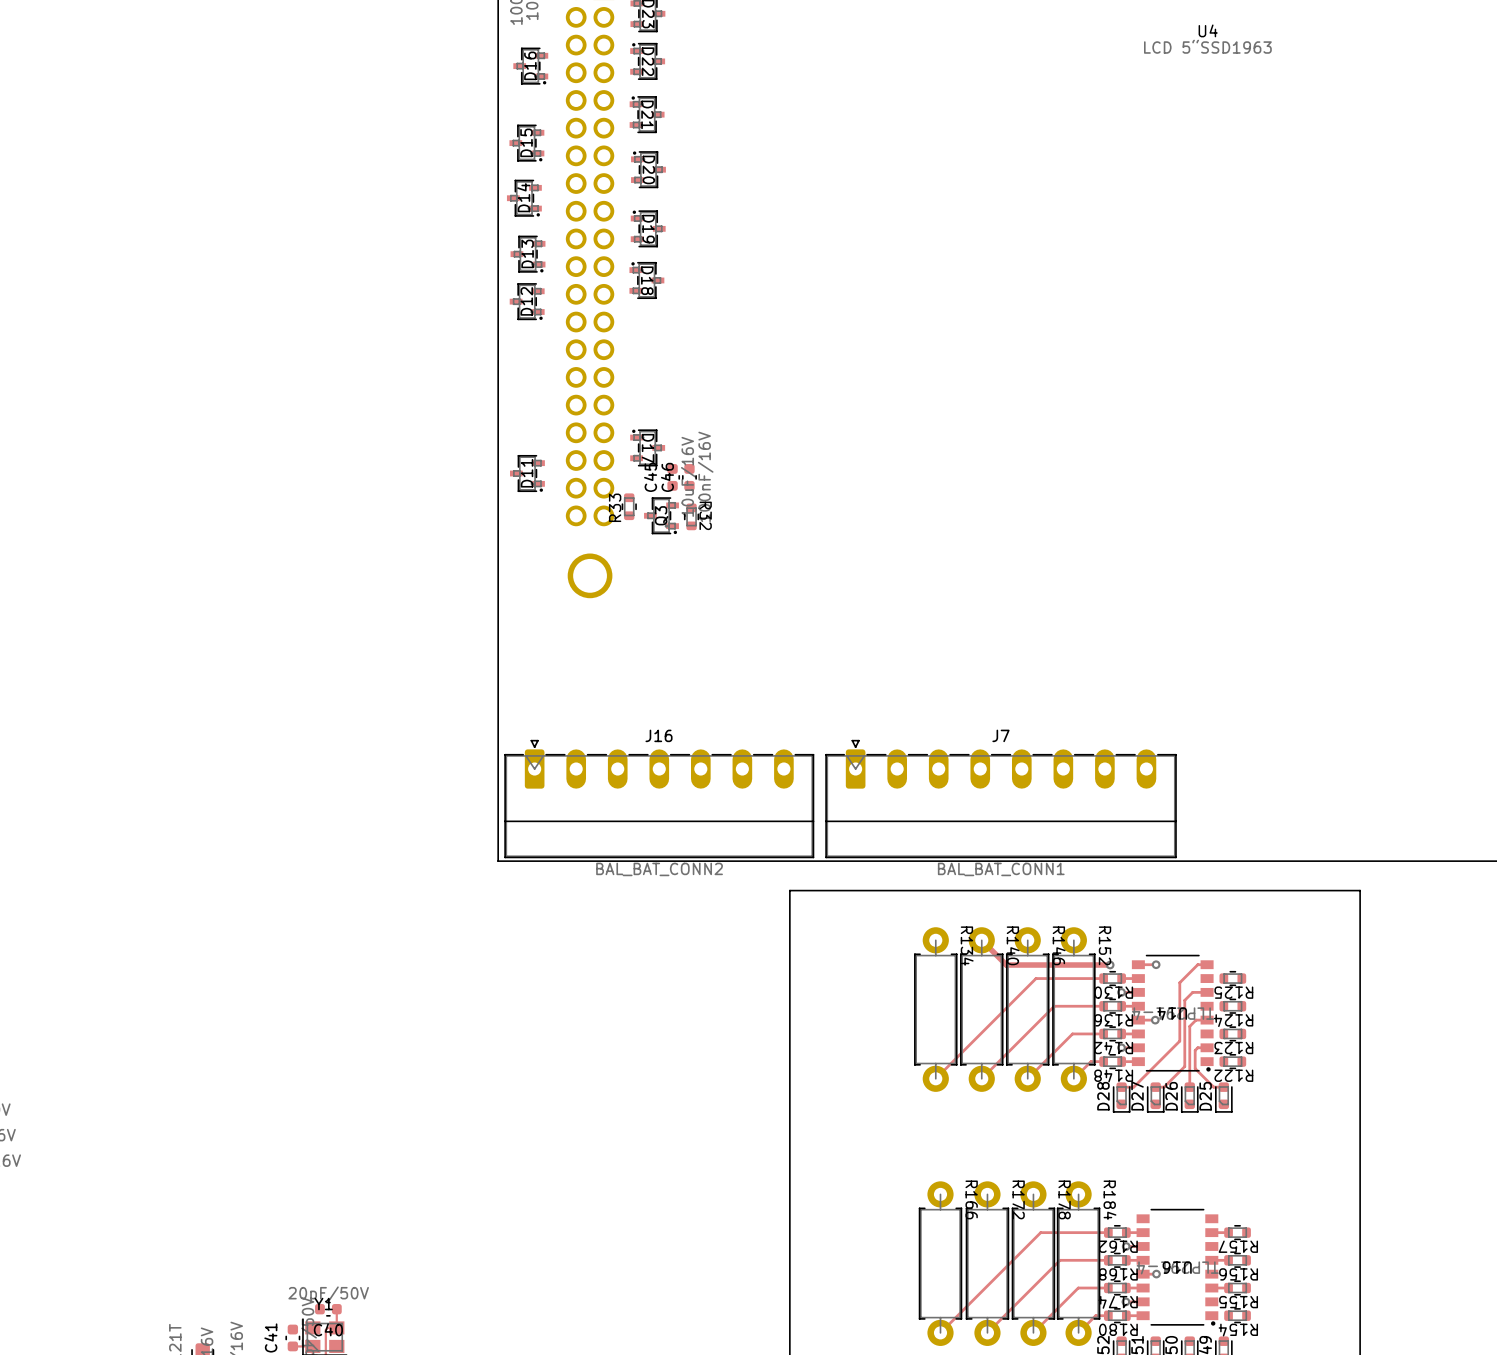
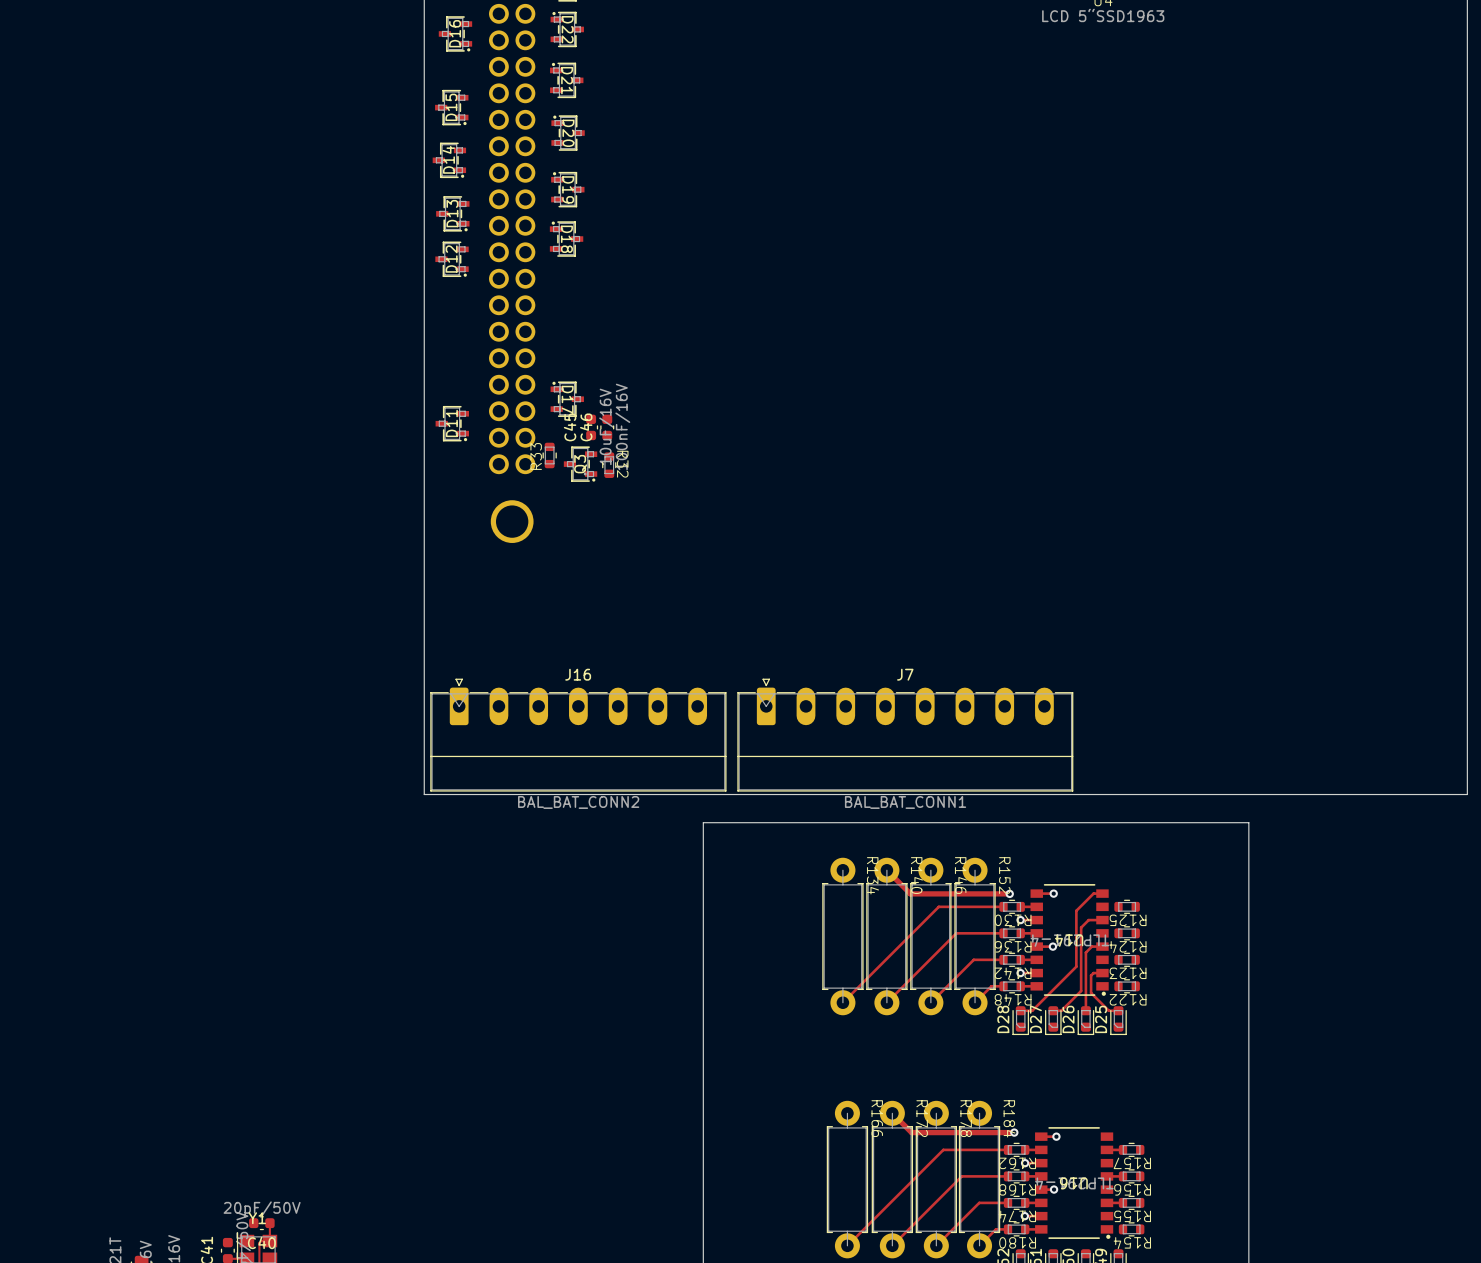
track: none -> (892, 1113) (911, 1132) (1014, 1132)
via: none -> (1014, 1132)
track: none -> (1041, 1136) (1054, 1136)
via: none -> (1056, 1136)

